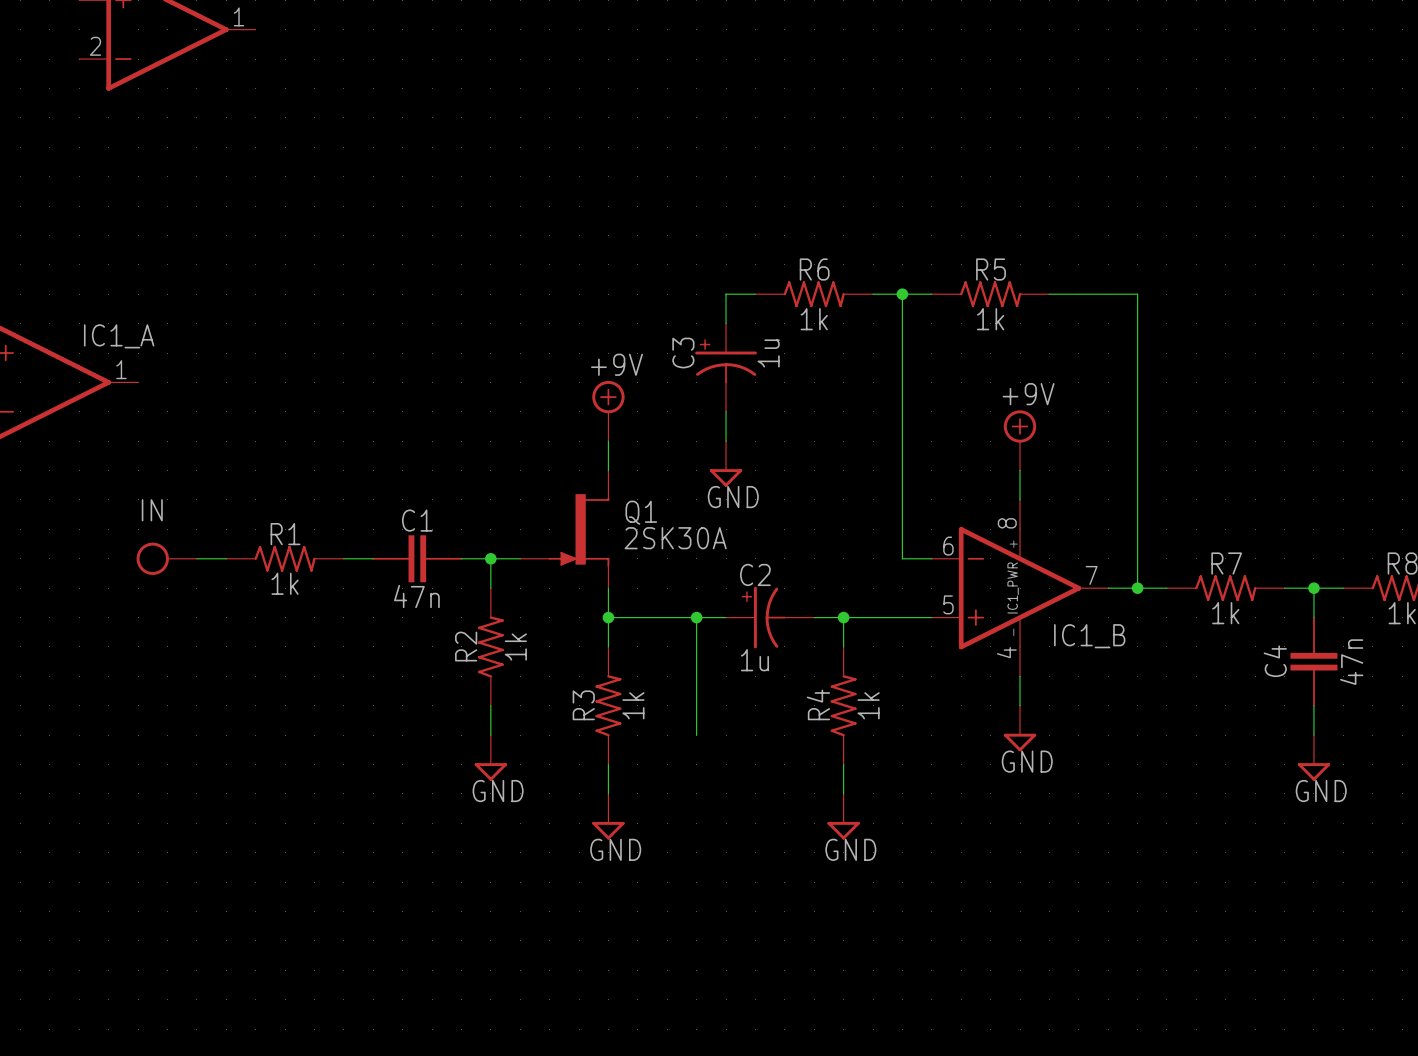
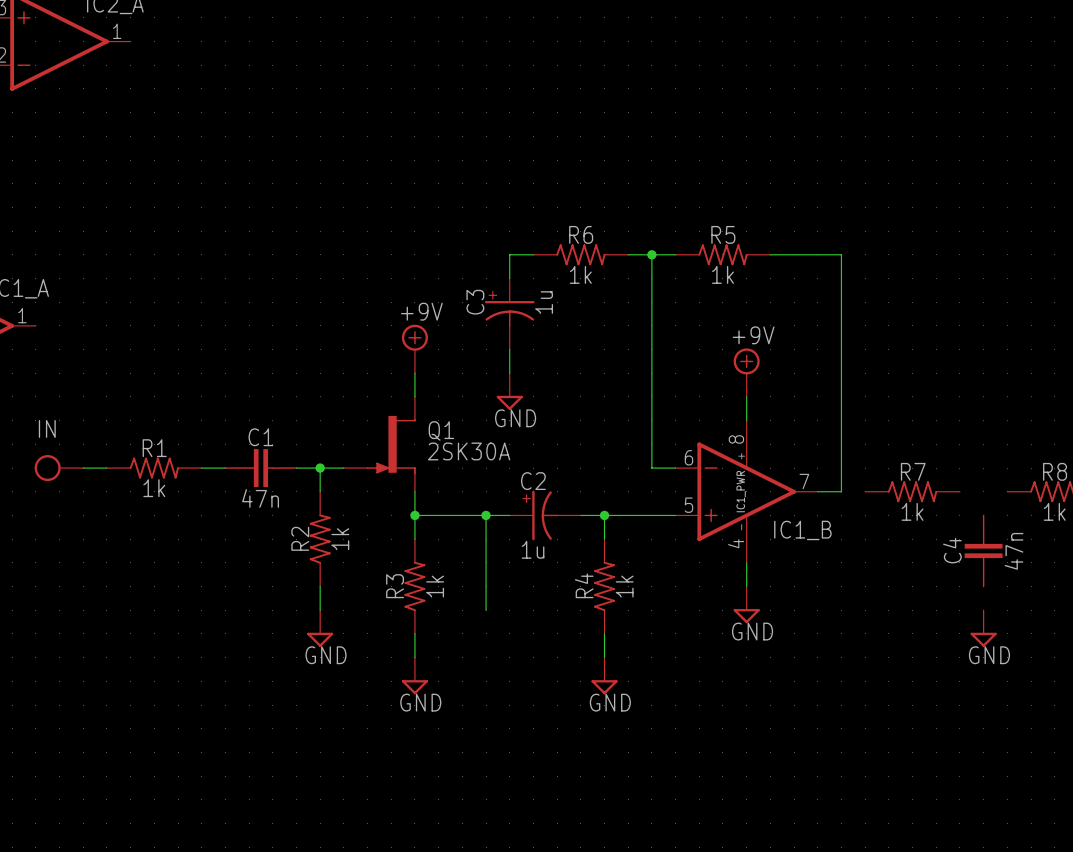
wire: (1137, 588) (1166, 588) -> none
junction: (1137, 588) -> none
wire: (1284, 588) (1343, 588) -> none
wire: (1313, 588) (1313, 617) -> none
junction: (1313, 588) -> none
wire: (1313, 705) (1313, 735) -> none

